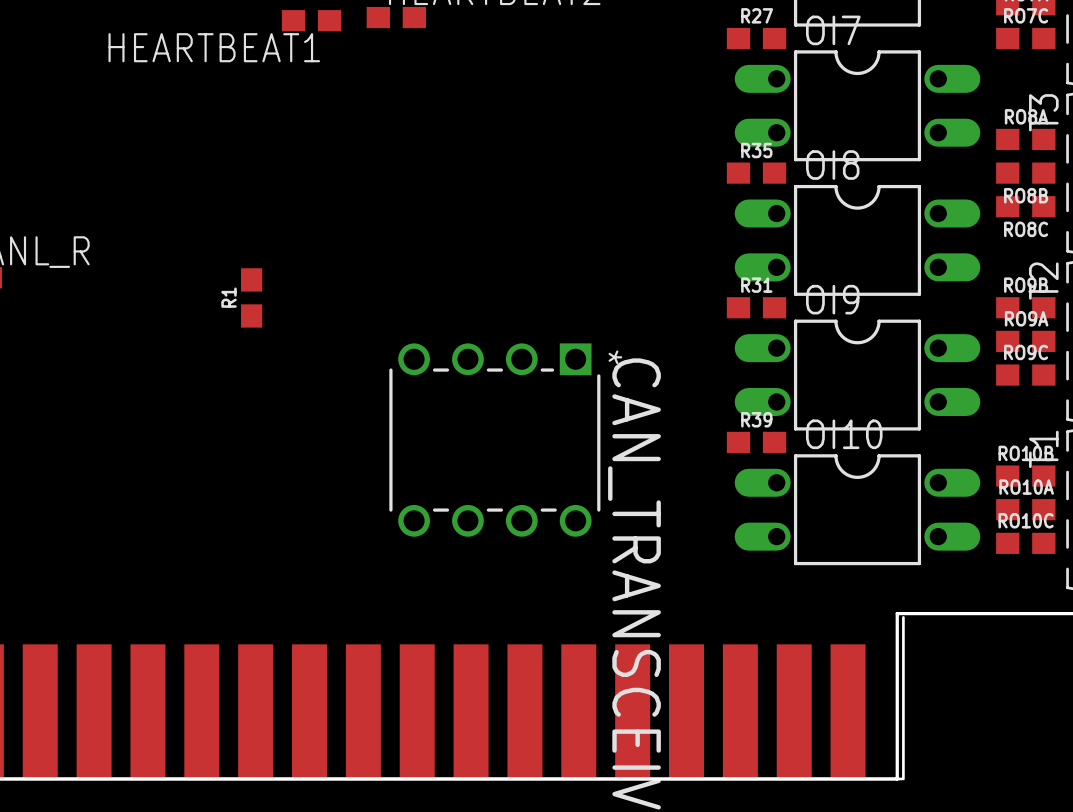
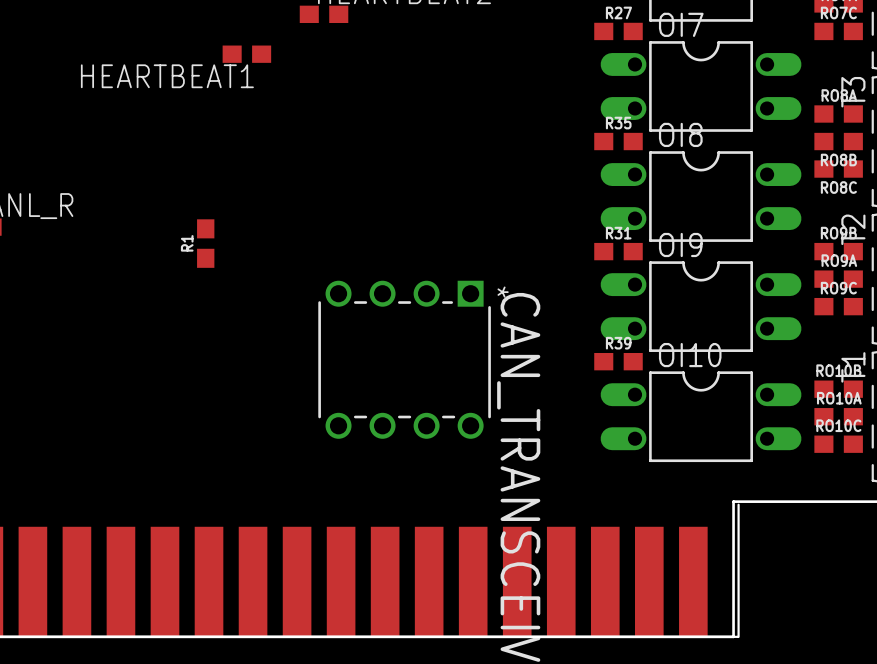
HEARTBEAT1 position: (311, 20) -> (246, 54)

